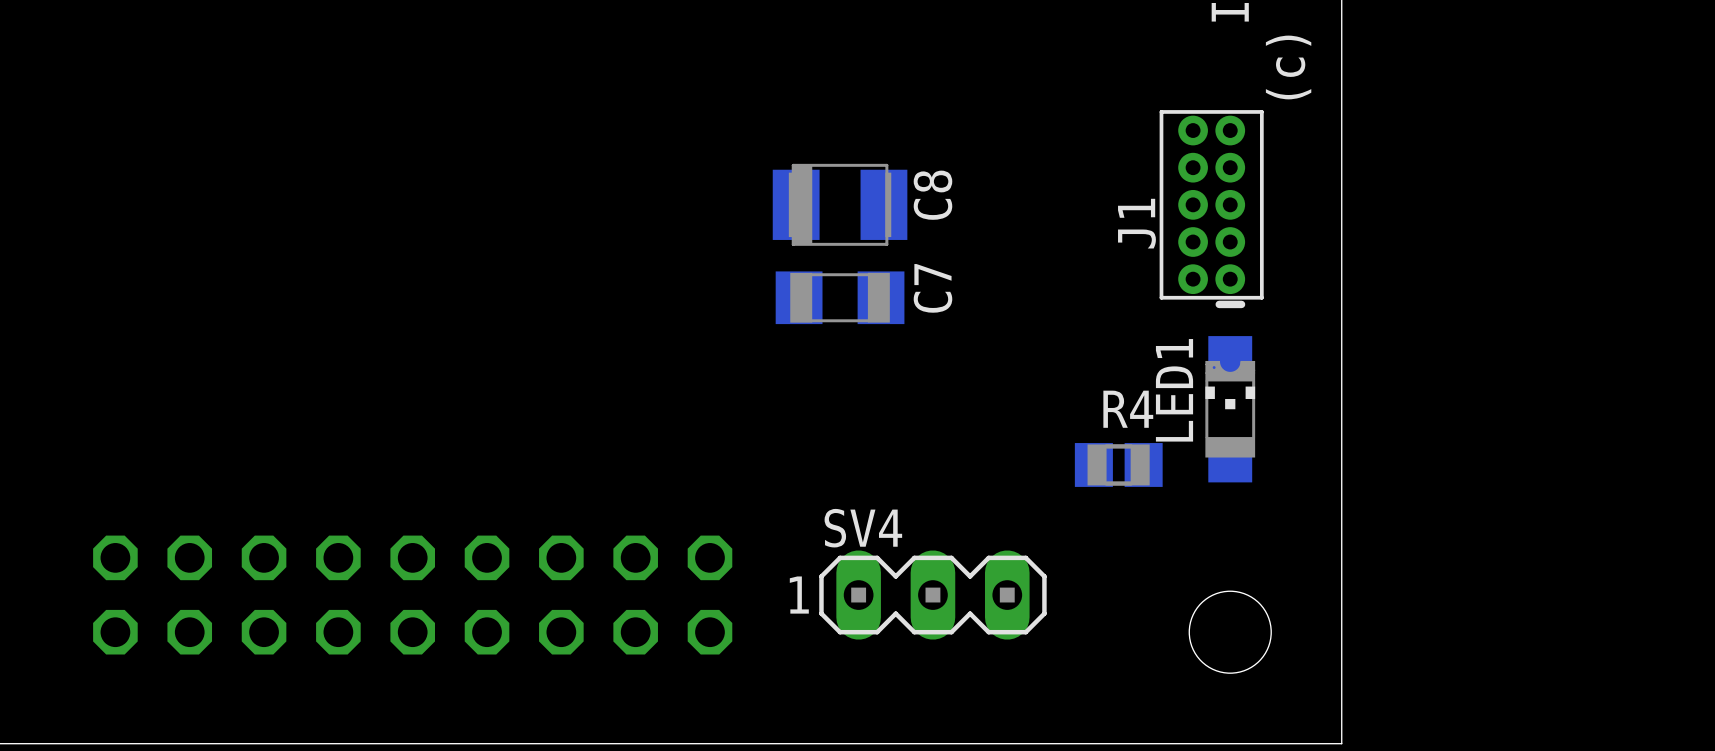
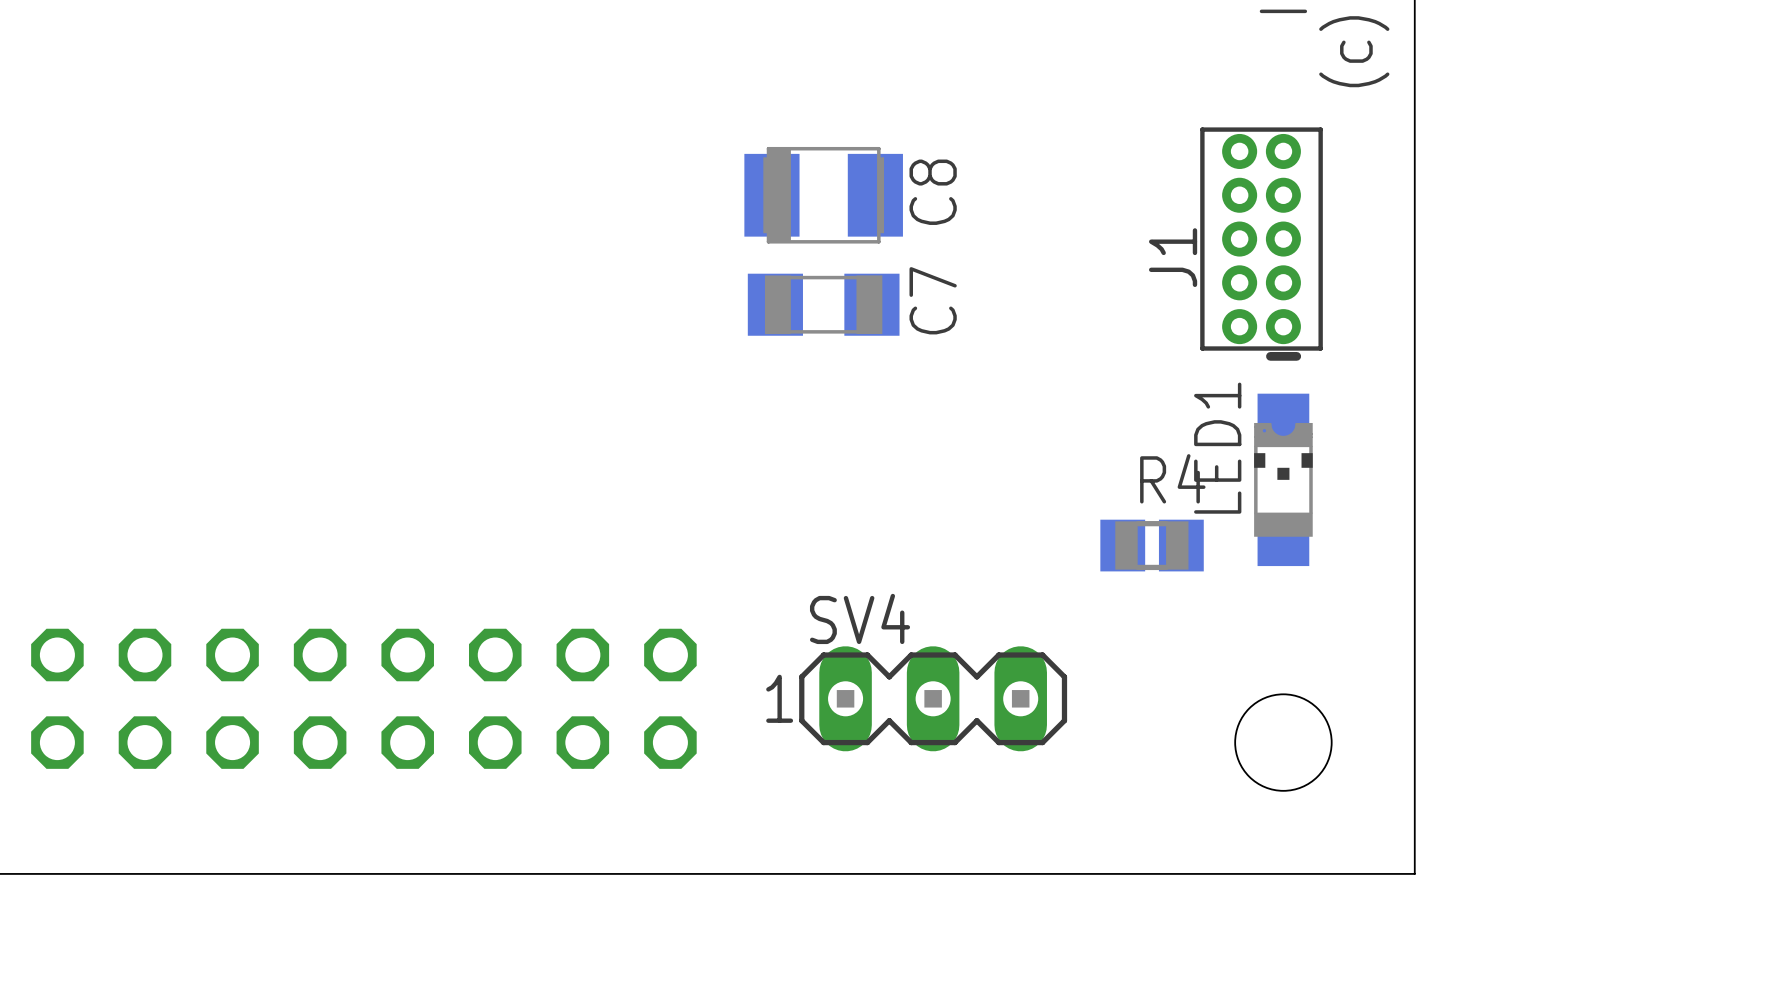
C8 position: (840, 204) -> (823, 195)
C7 position: (840, 297) -> (823, 304)

